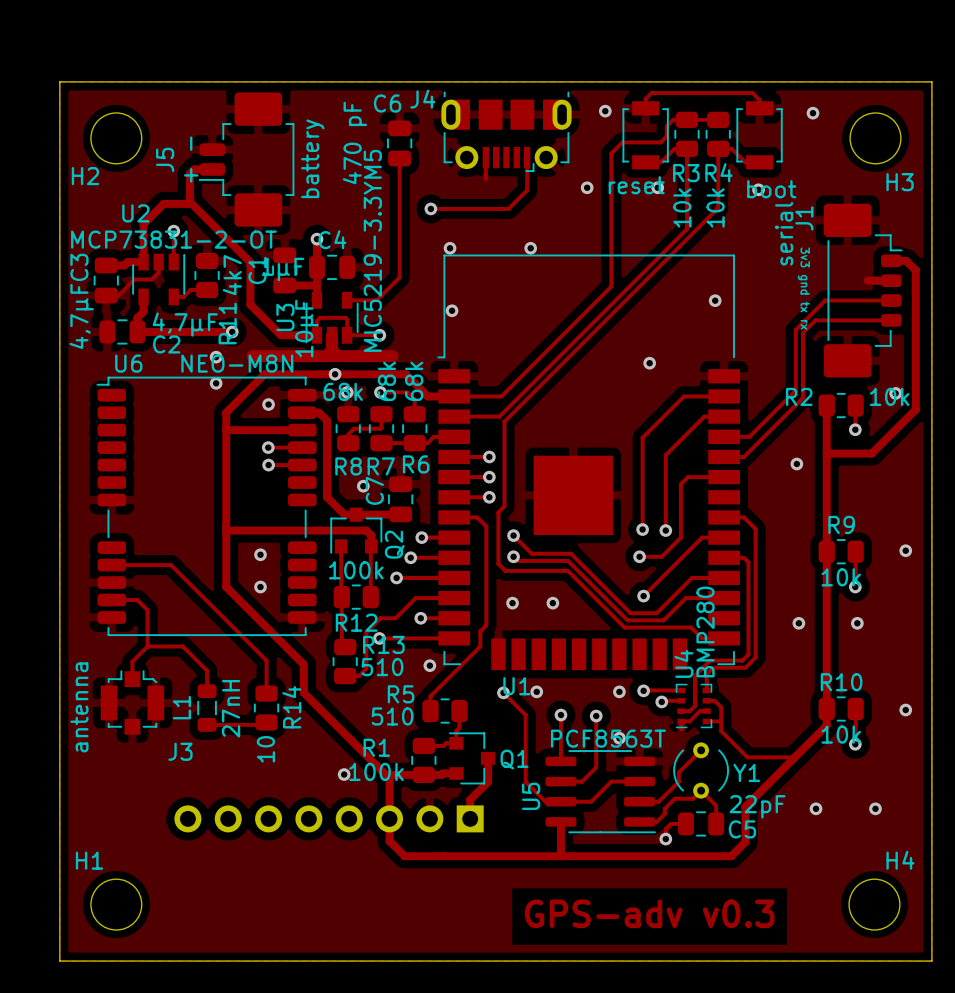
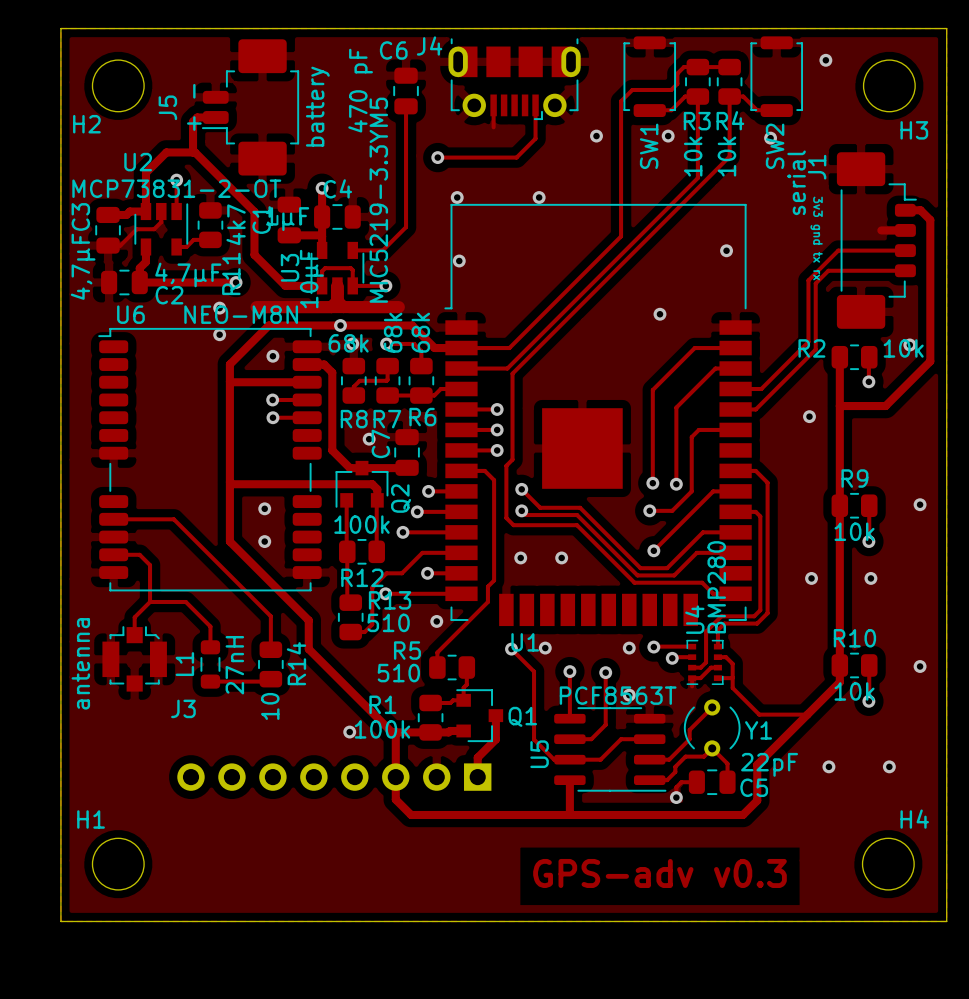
track: (645, 108) (645, 99) (651, 93) (752, 93) (759, 100) (759, 108) -> none
via: (605, 111) -> none
SW1: none -> (649, 76)
SW2: none -> (776, 76)
part: reset (645, 135) -> none
part: boot (759, 135) -> none

